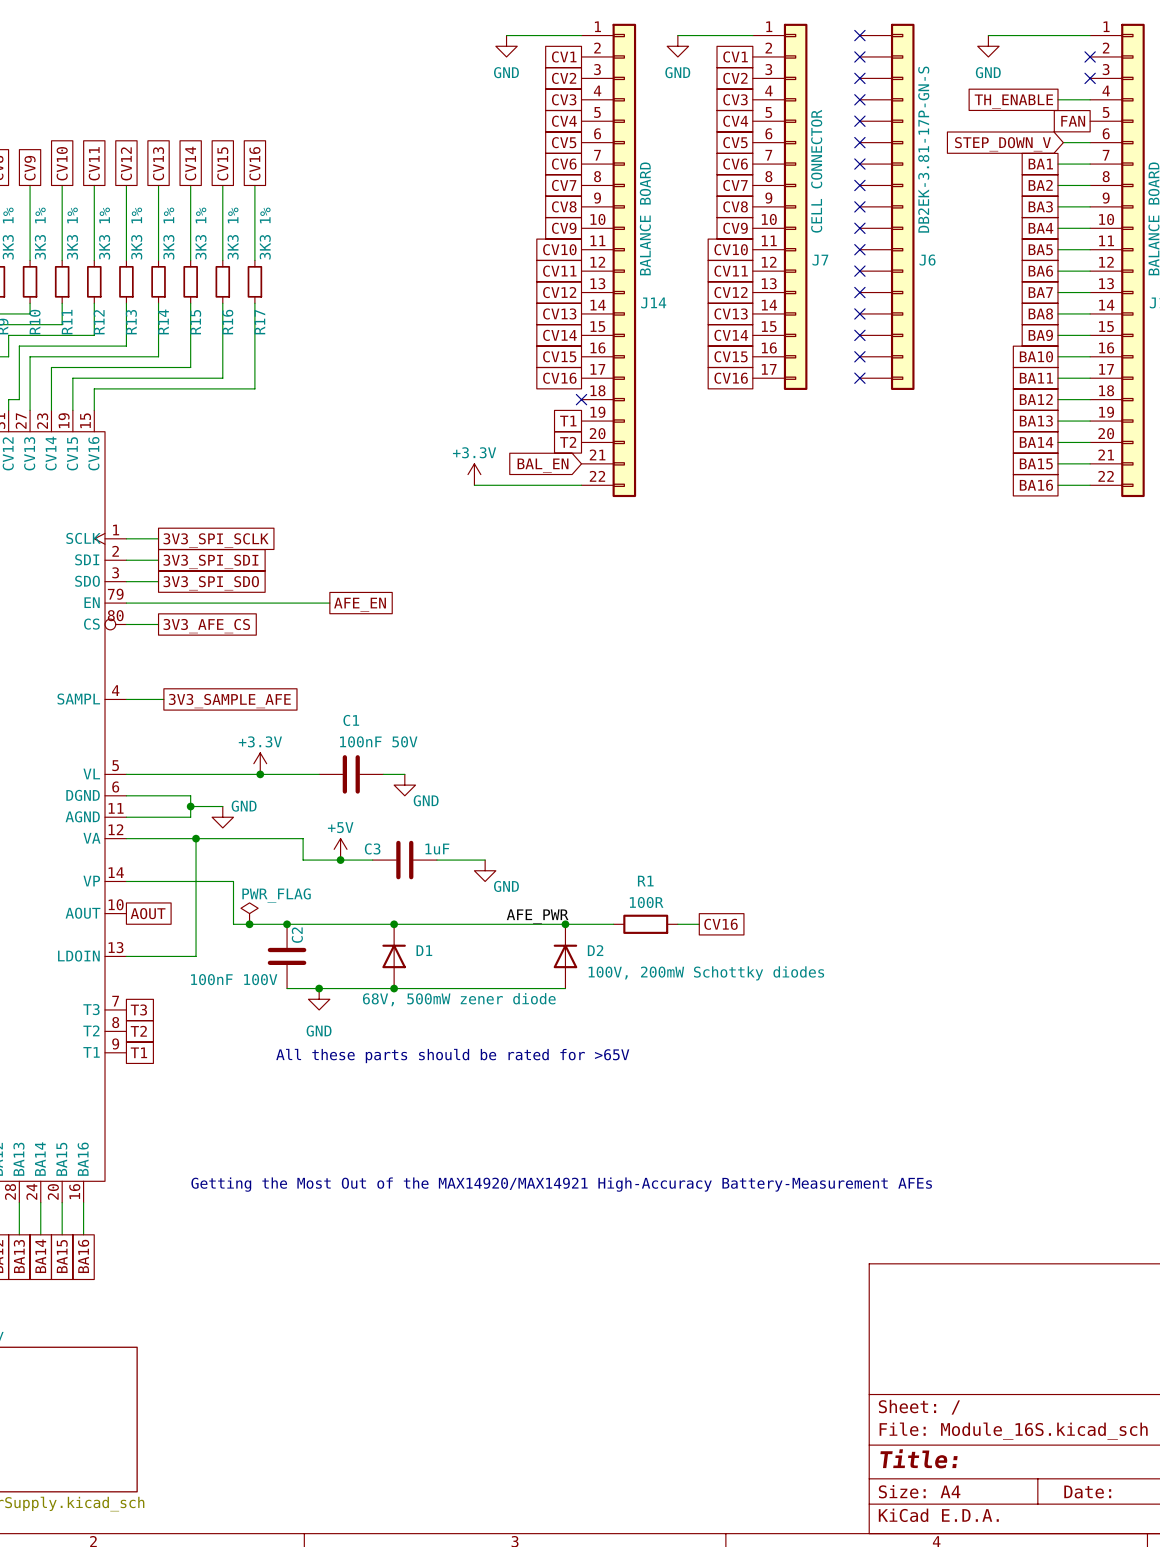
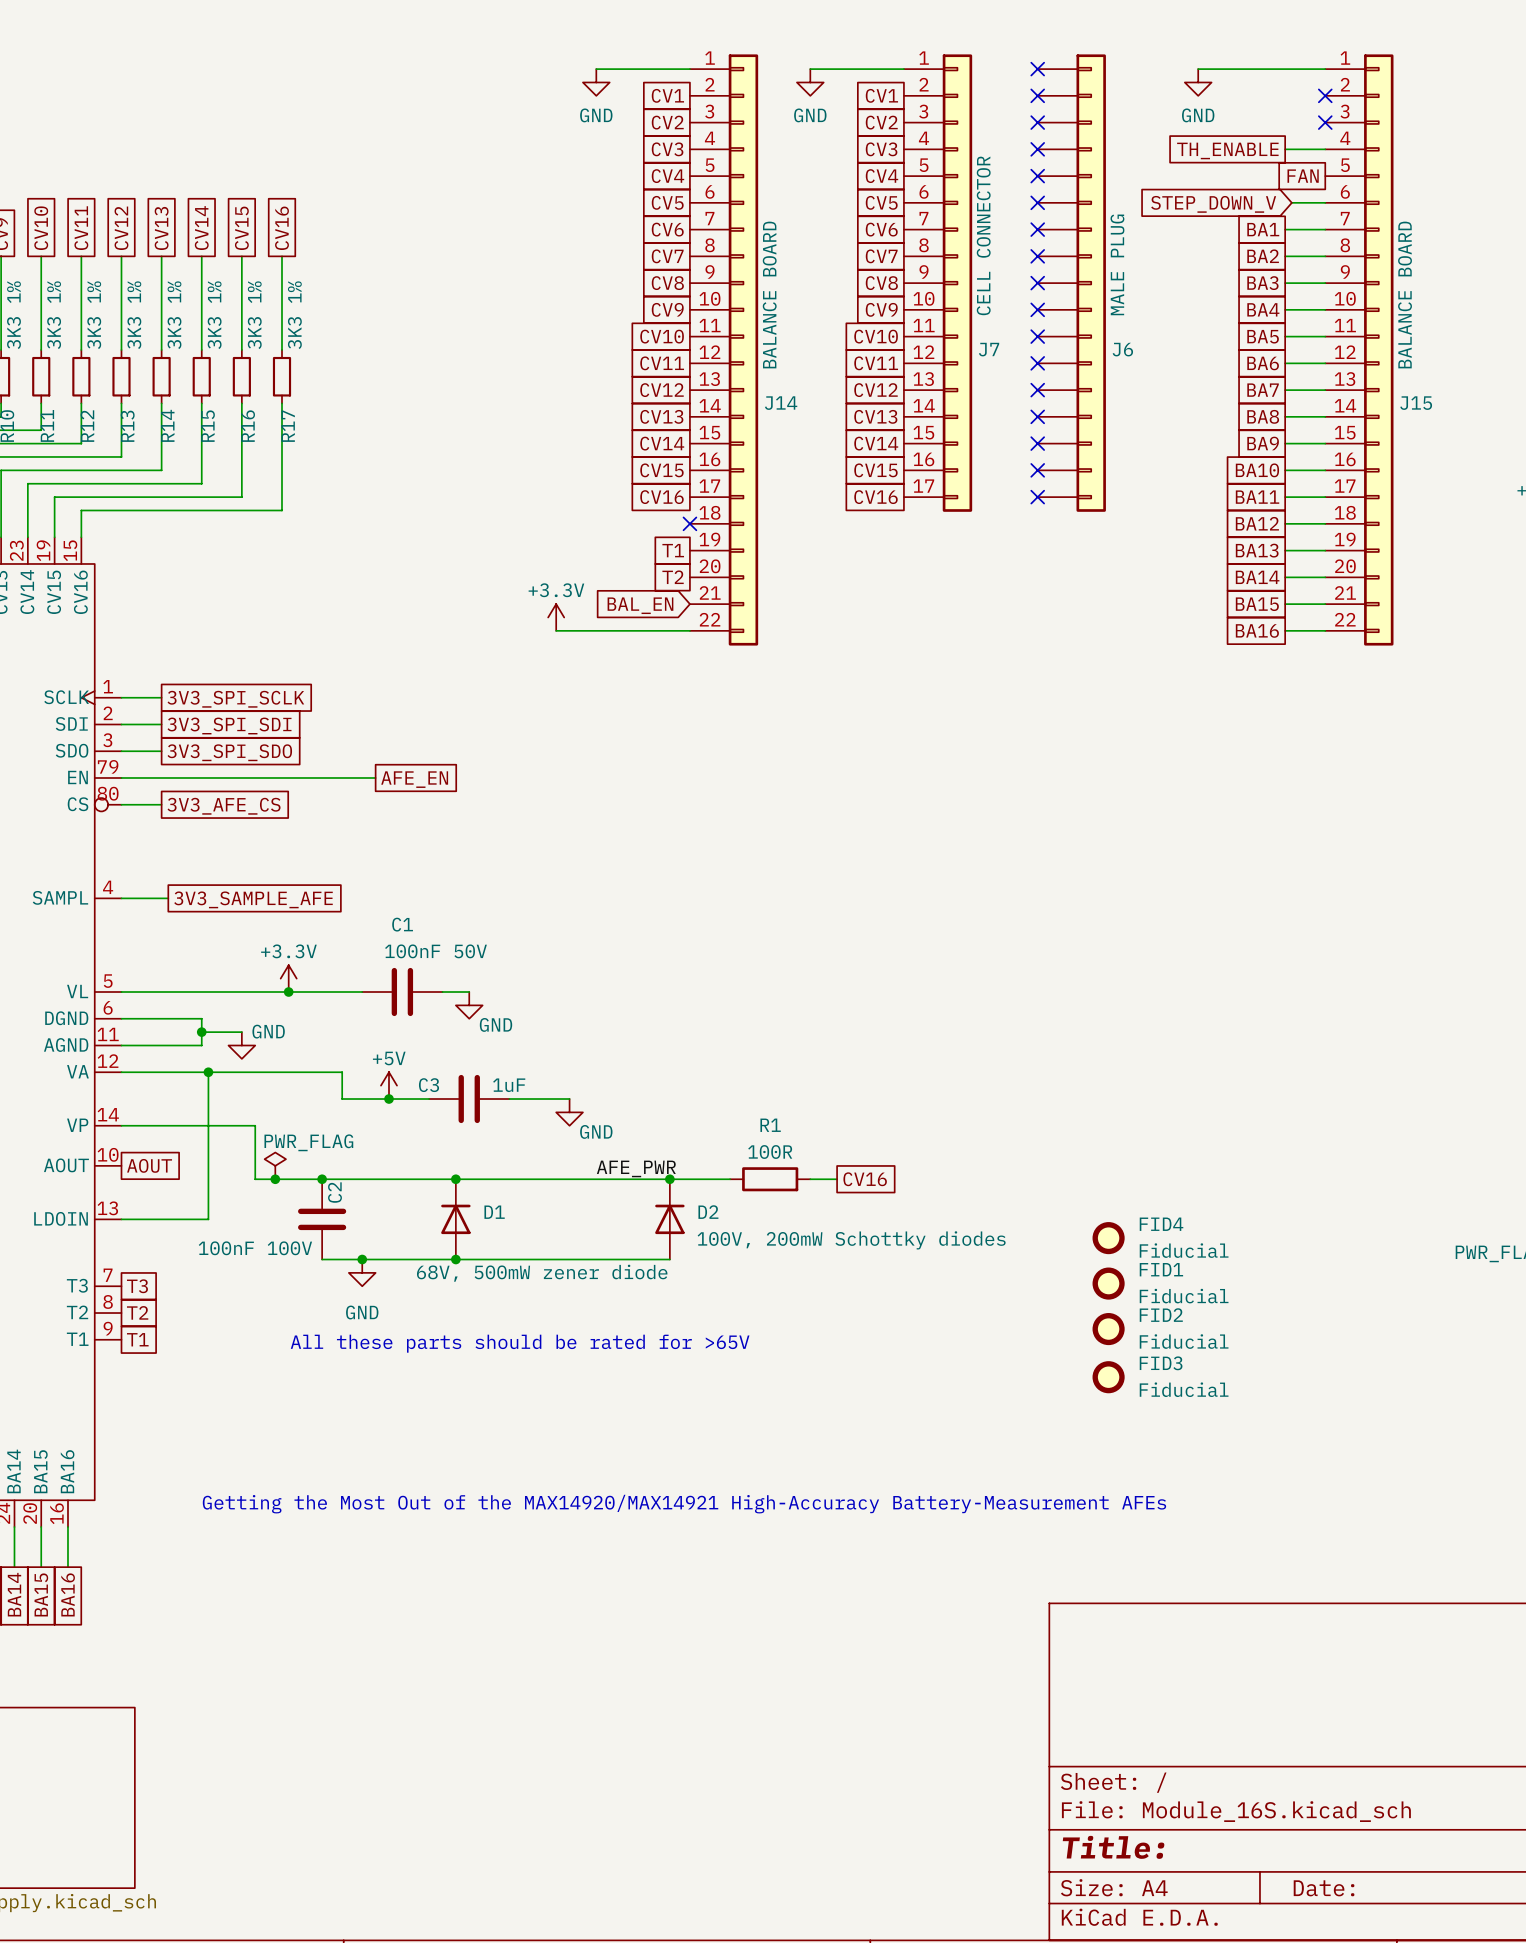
J6 value: DB2EK-3.81-17P-GN-S (923, 149) -> MALE PLUG (1117, 264)
FID4: none -> Fiducial (1108, 1238)
FID1: none -> Fiducial (1108, 1283)
FID2: none -> Fiducial (1108, 1329)
FID3: none -> Fiducial (1108, 1377)

